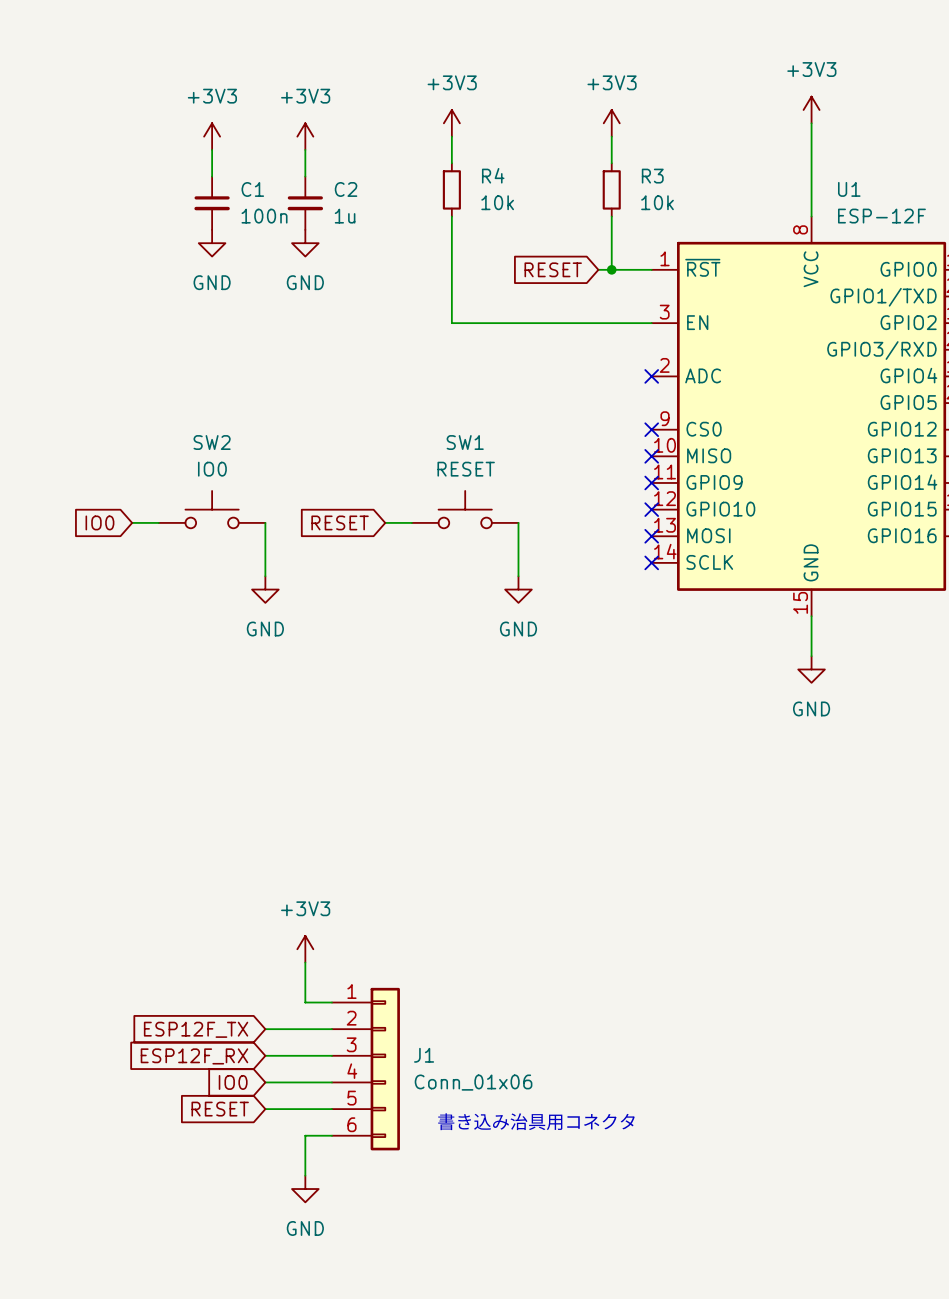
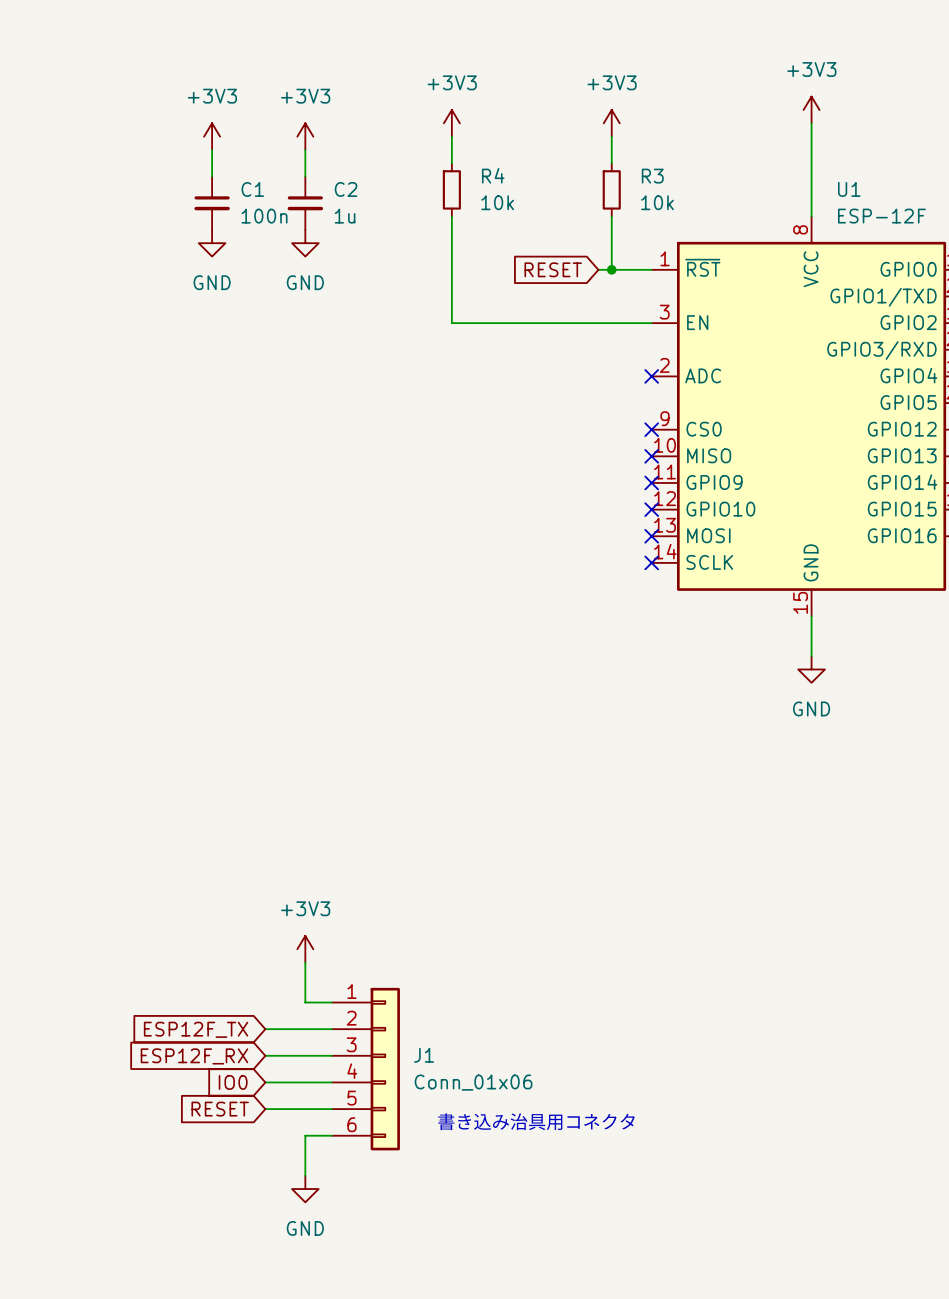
SW2: IO0 (212, 509) -> none
SW1: RESET (465, 509) -> none
global label: IO0 (99, 522) -> none
wire: (132, 522) (158, 522) -> none
wire: (265, 522) (265, 576) -> none
global label: RESET (340, 522) -> none
wire: (385, 522) (411, 522) -> none
wire: (518, 522) (518, 576) -> none
power symbol: GND (265, 589) -> none
power symbol: GND (518, 589) -> none

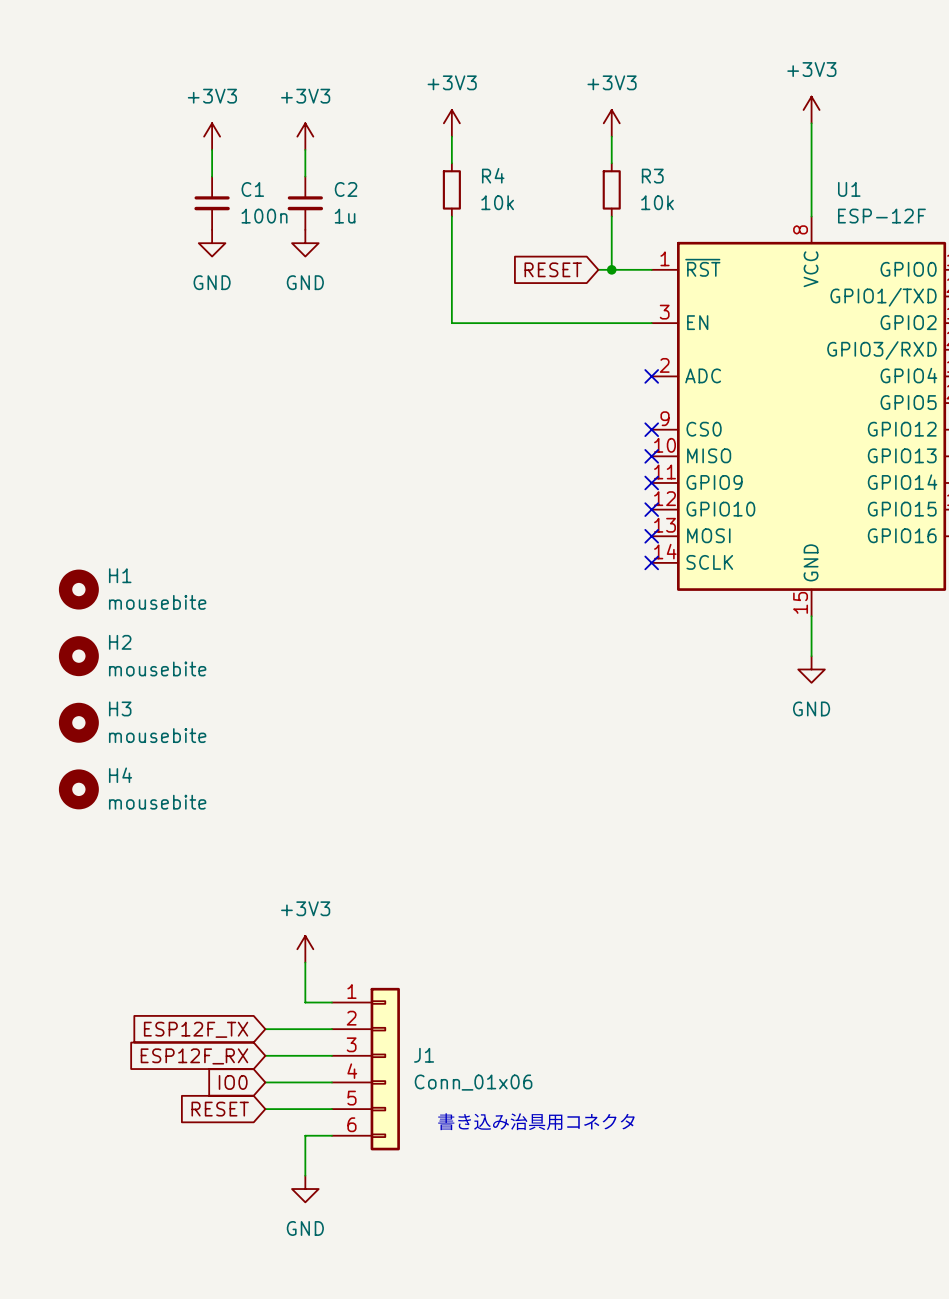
H1: none -> mousebite (78, 589)
H2: none -> mousebite (78, 656)
H3: none -> mousebite (78, 722)
H4: none -> mousebite (78, 789)

